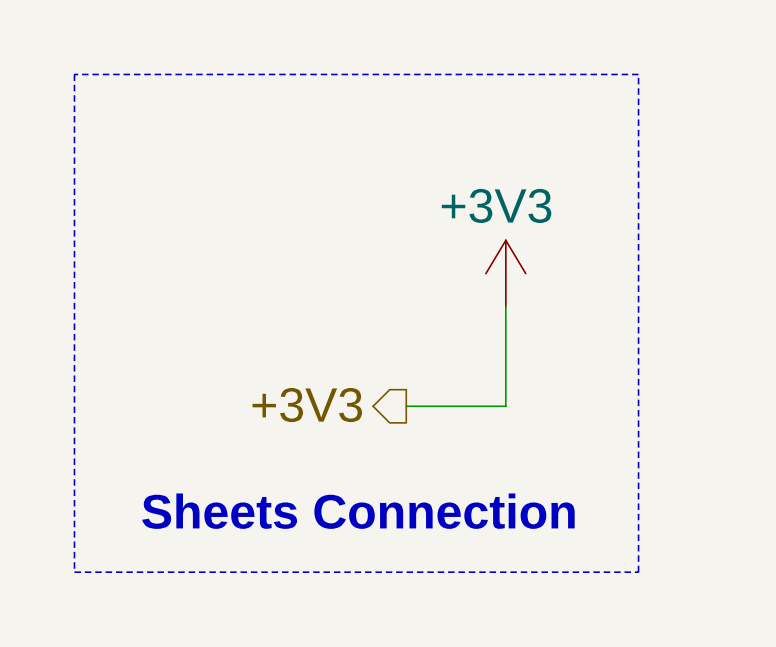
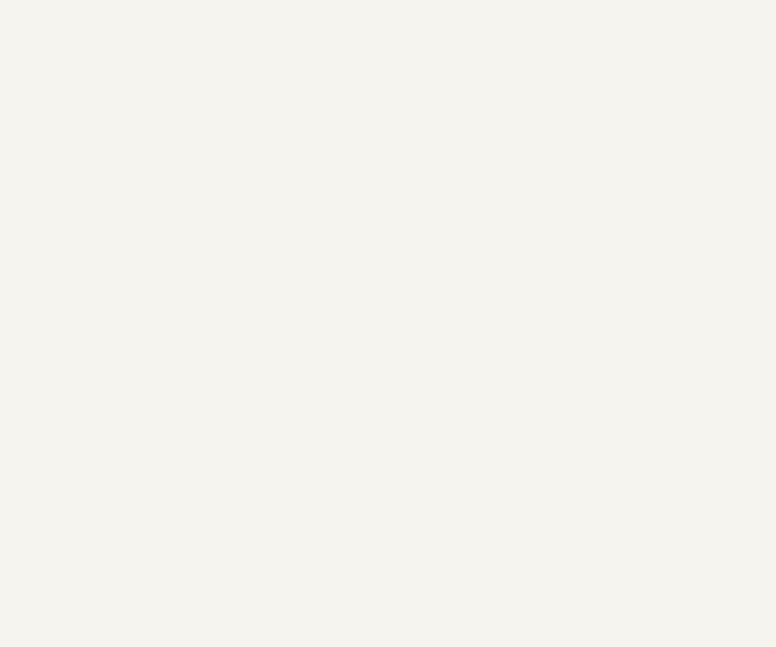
line: (74, 74) (638, 74) (638, 572) (74, 572) (74, 74) -> none
power symbol: +3V3 (505, 273) -> none
wire: (505, 306) (505, 406) (406, 406) -> none
hierarchical label: +3V3 (307, 405) -> none
text: Sheets Connection (358, 511) -> none

